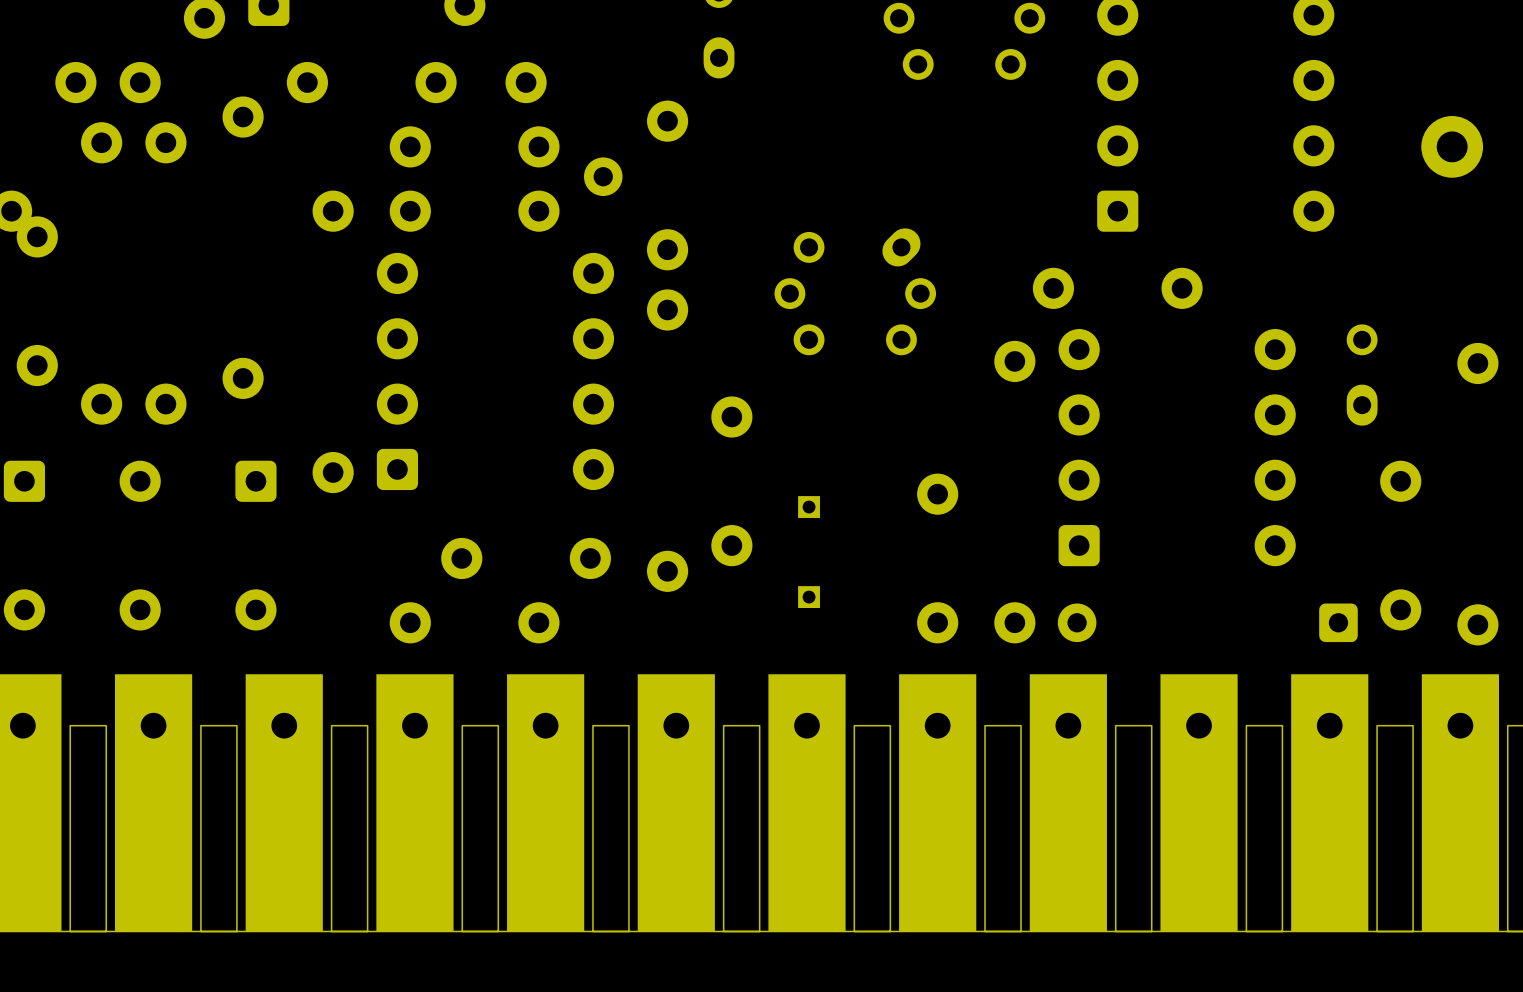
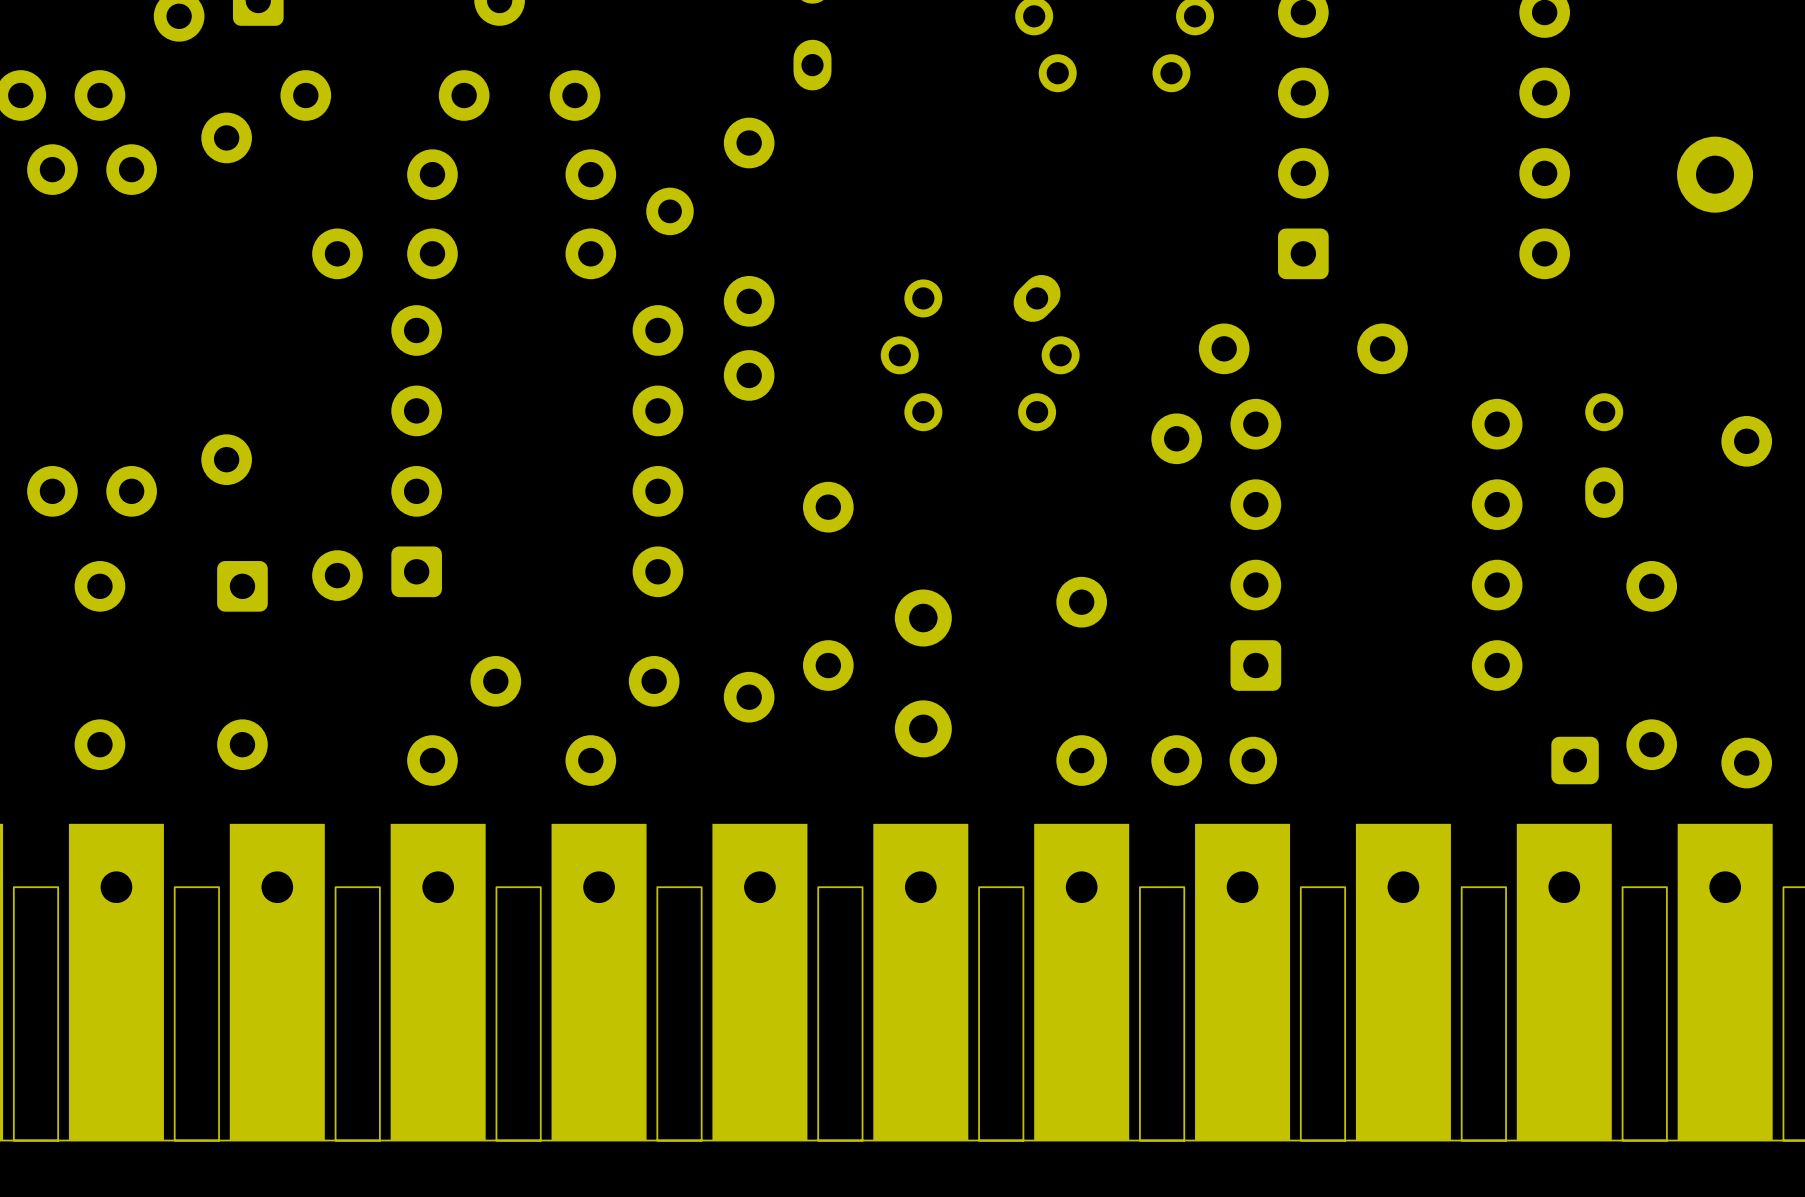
part footprint: [798, 496, 820, 518] -> [894, 589, 952, 647]
part footprint: [798, 586, 820, 608] -> [894, 700, 952, 758]

